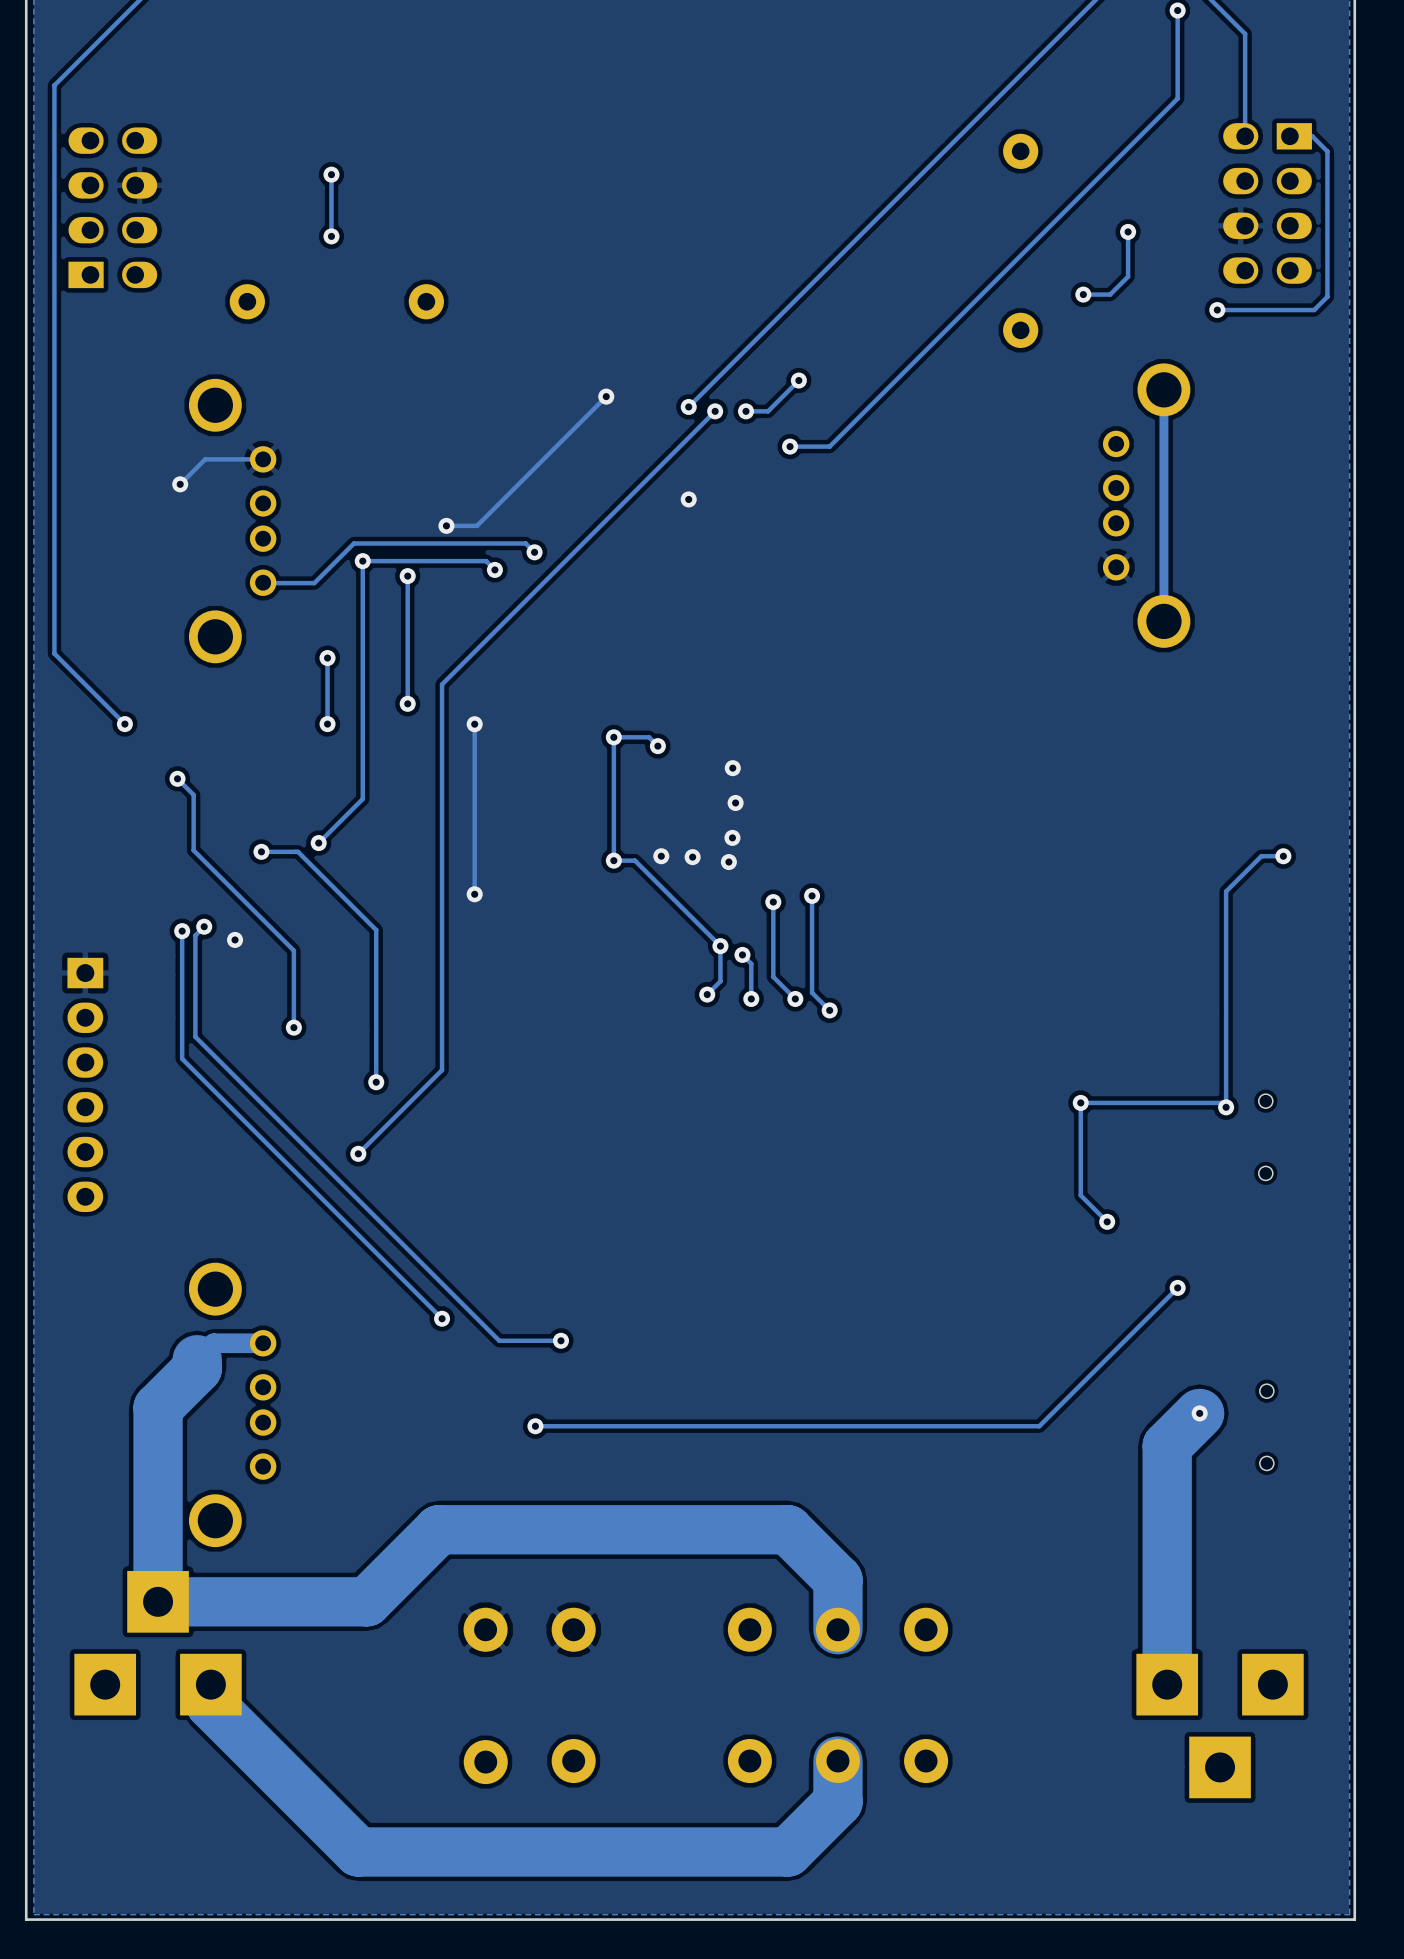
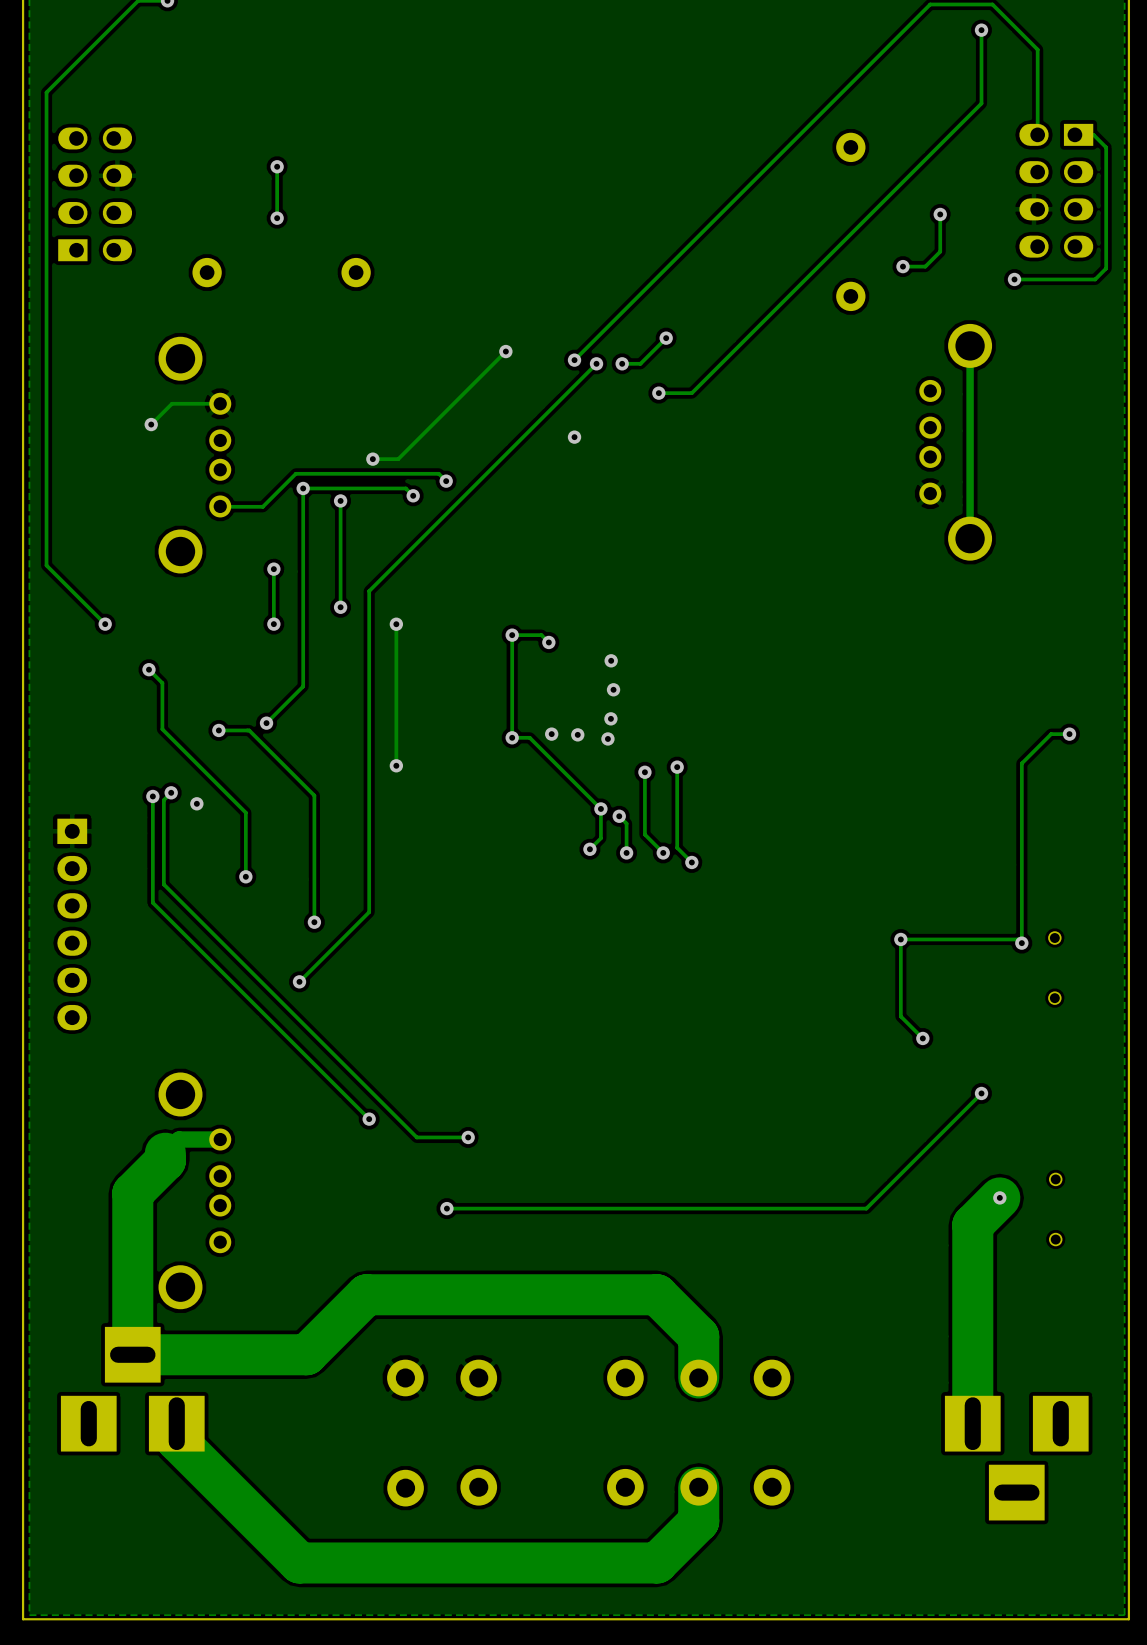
part footprint: [74, 1571, 242, 1716] -> [60, 1326, 205, 1452]
part footprint: [1136, 1653, 1304, 1799] -> [944, 1395, 1089, 1521]

